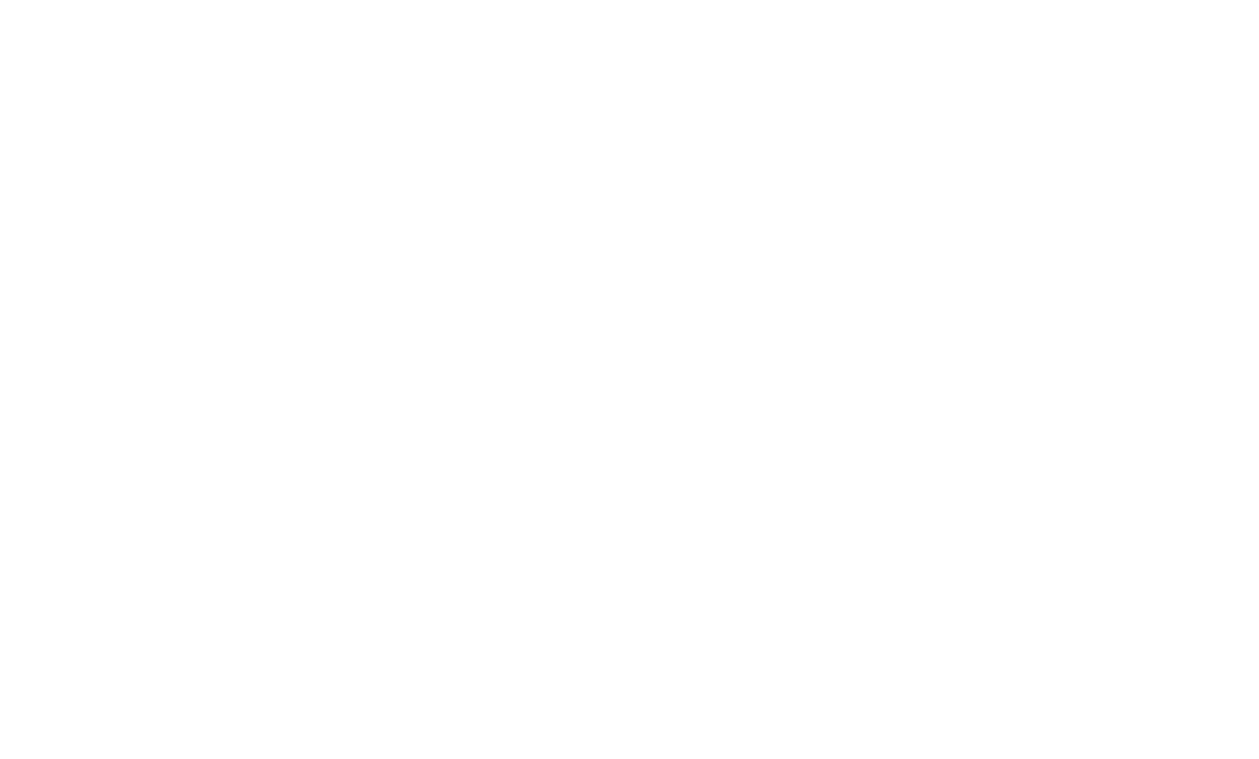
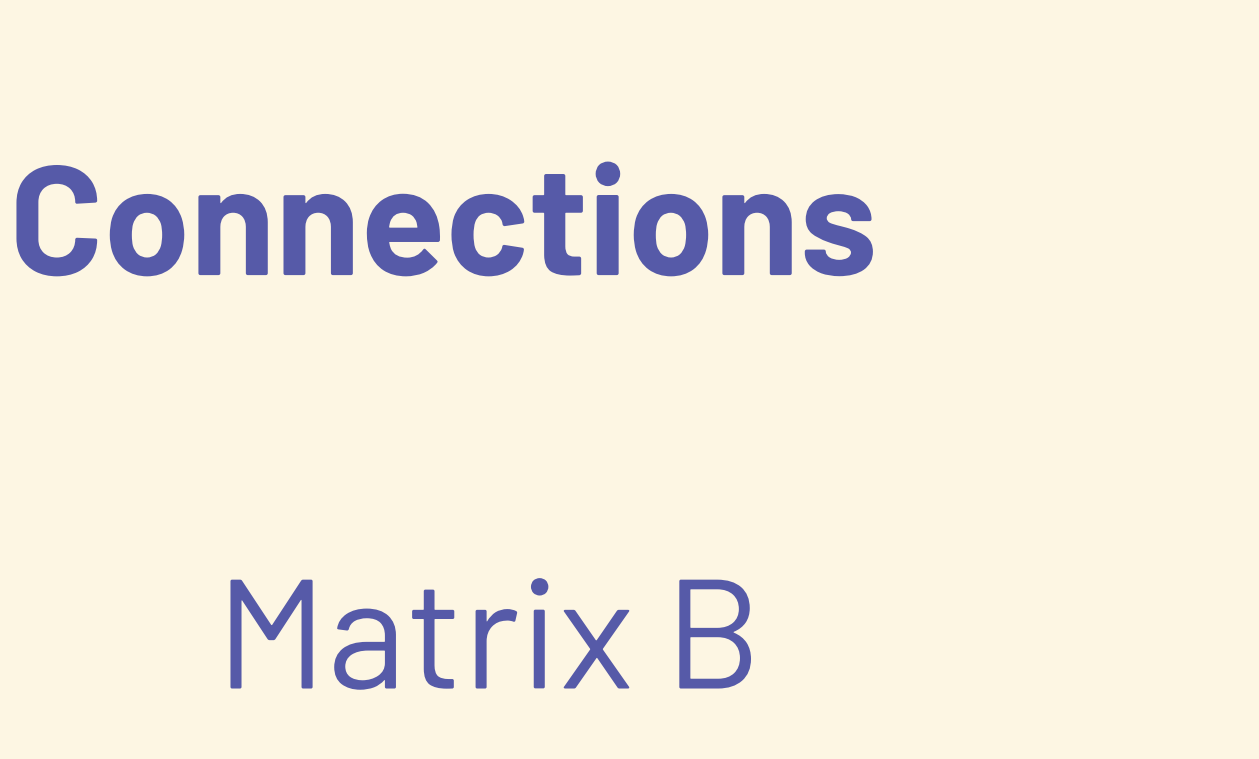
text: none -> Connections (444, 218)
text: none -> Matrix B (490, 633)

